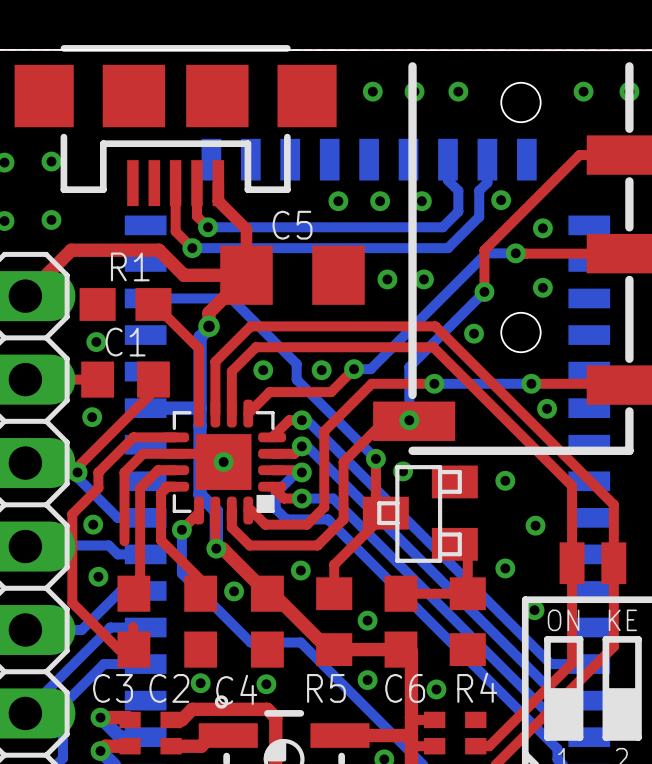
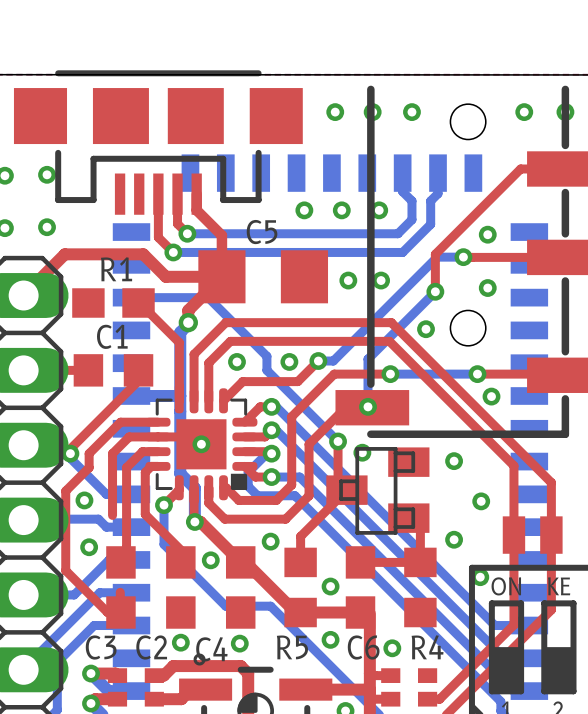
via: (501, 200) -> none
via: (96, 342) -> none
via: (92, 417) -> none

